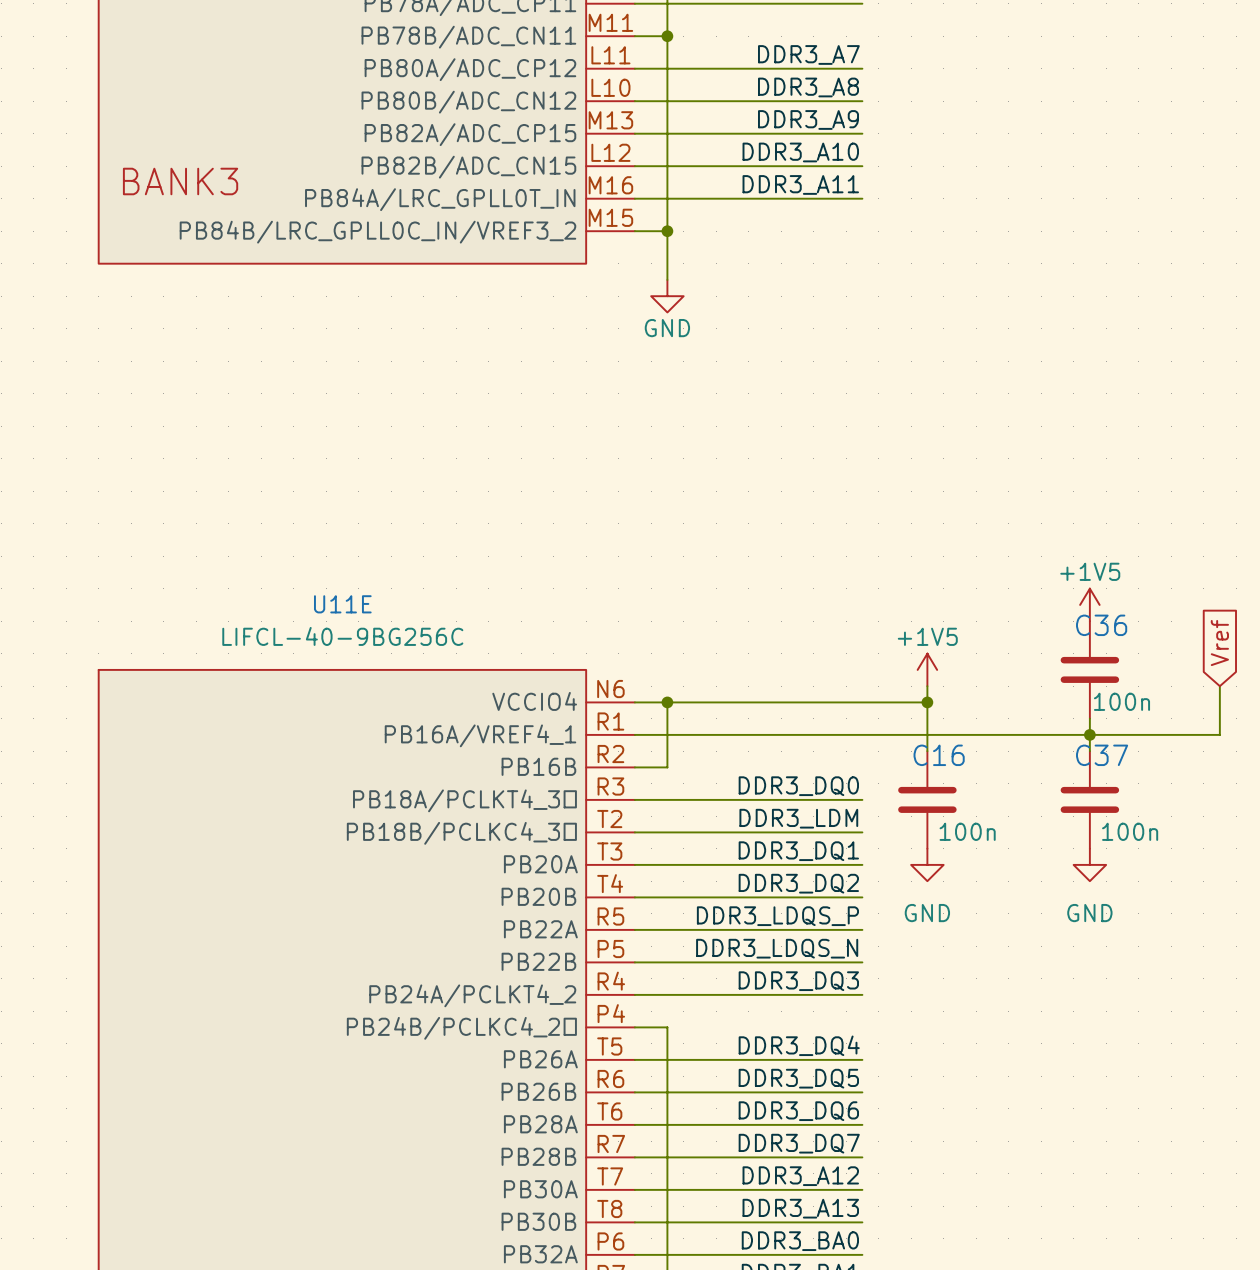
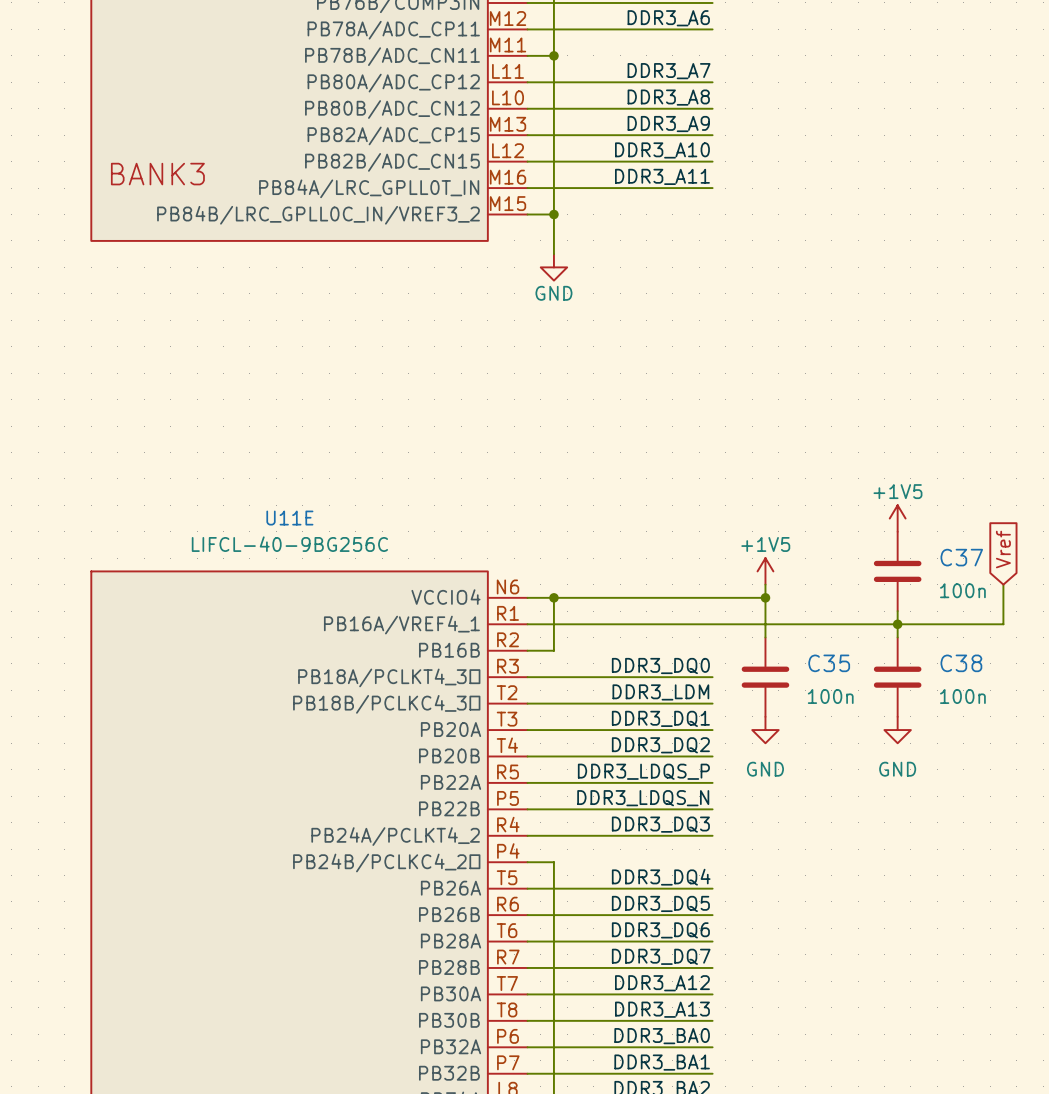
C36 name: C36 (1101, 625) -> C37 (961, 557)
C36 text position: 100n (1121, 701) -> 100n (962, 590)
C16 name: C16 (939, 755) -> C35 (829, 663)
C37 name: C37 (1102, 755) -> C38 (961, 663)
C16 text position: 100n (967, 831) -> 100n (830, 696)
C37 text position: 100n (1130, 831) -> 100n (962, 696)

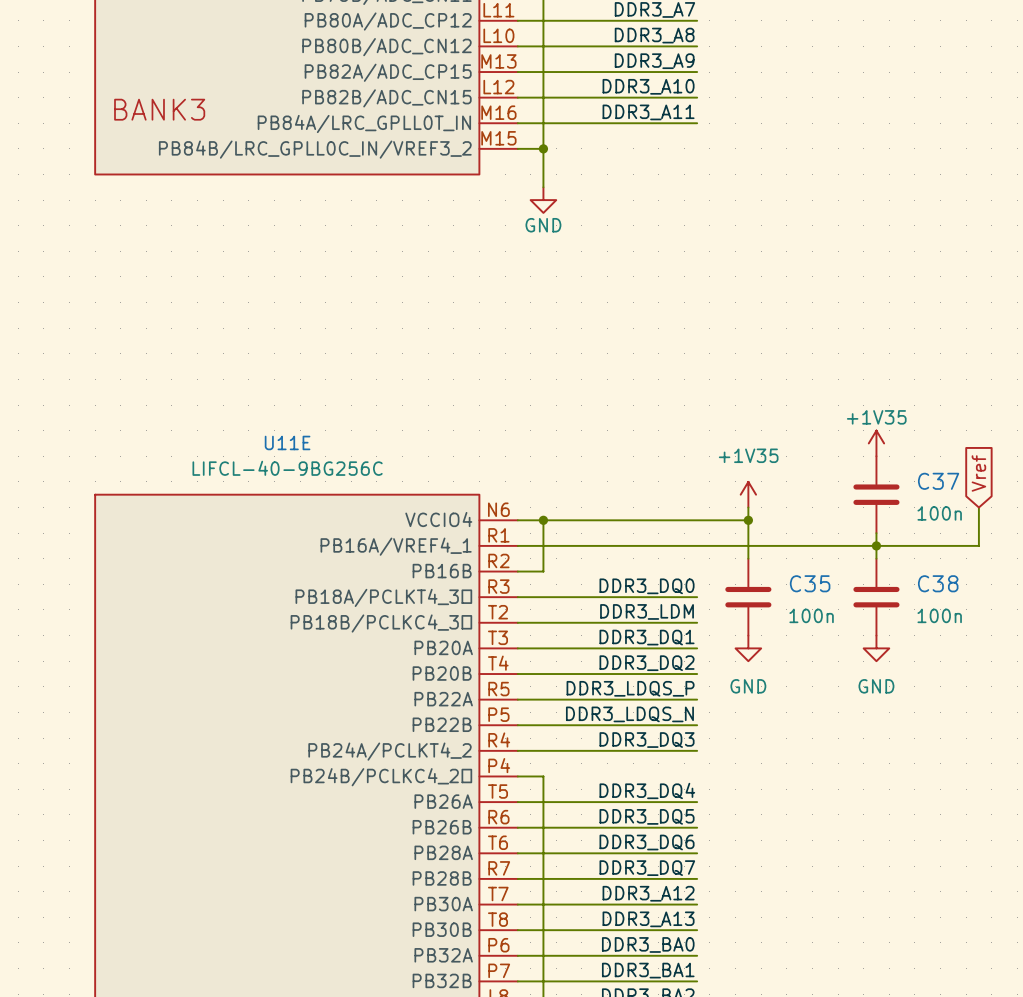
power symbol: +1V5 (897, 518) -> +1V35 (876, 443)
power symbol: +1V5 (765, 571) -> +1V35 (748, 494)

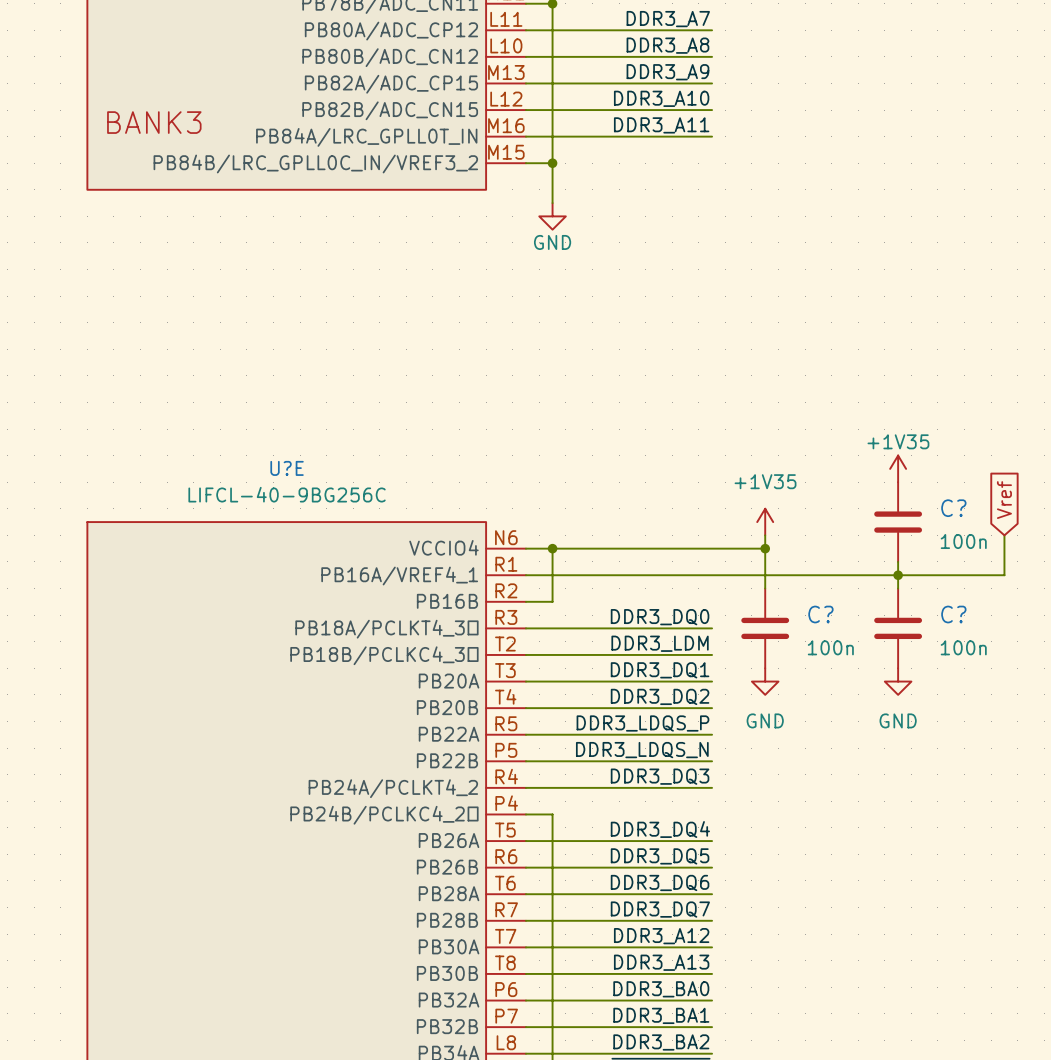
U11E name: U11E (287, 442) -> U?E (287, 468)
C37 name: C37 (938, 481) -> C? (953, 508)
C35 name: C35 (810, 583) -> C? (820, 614)
C38 name: C38 (938, 583) -> C? (953, 614)

